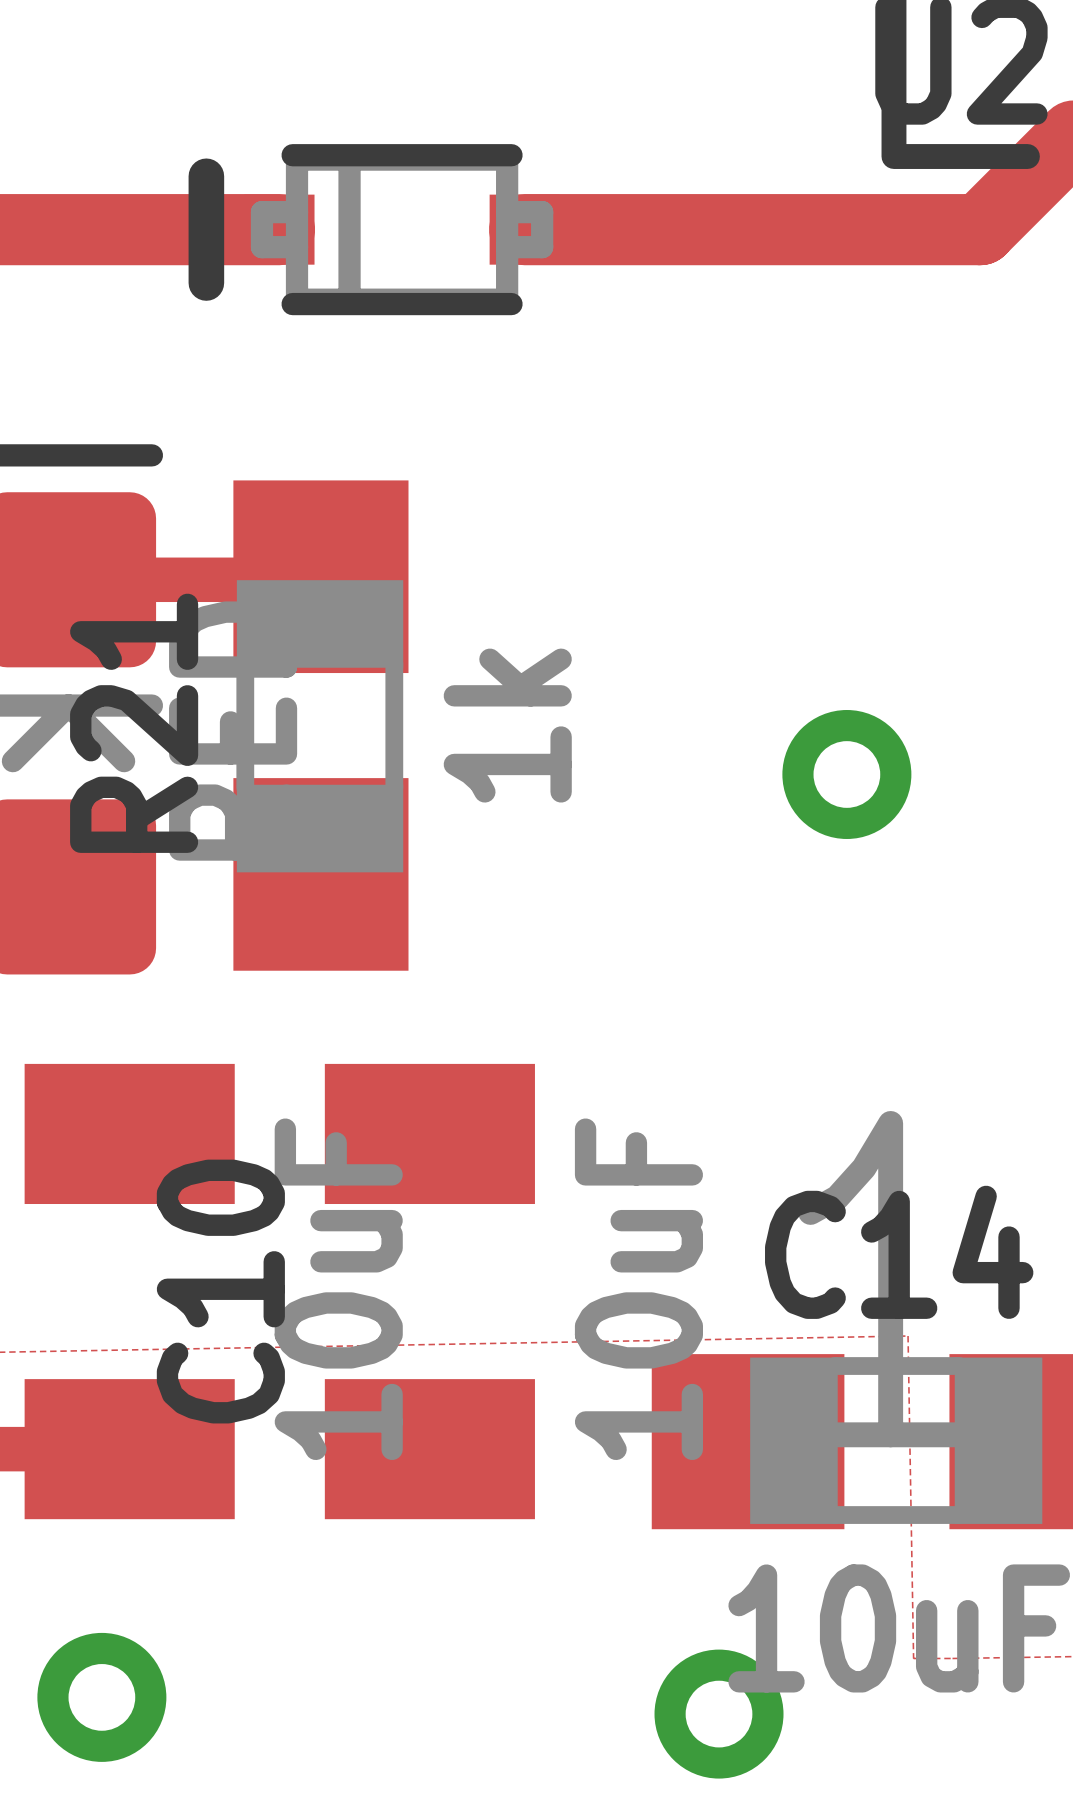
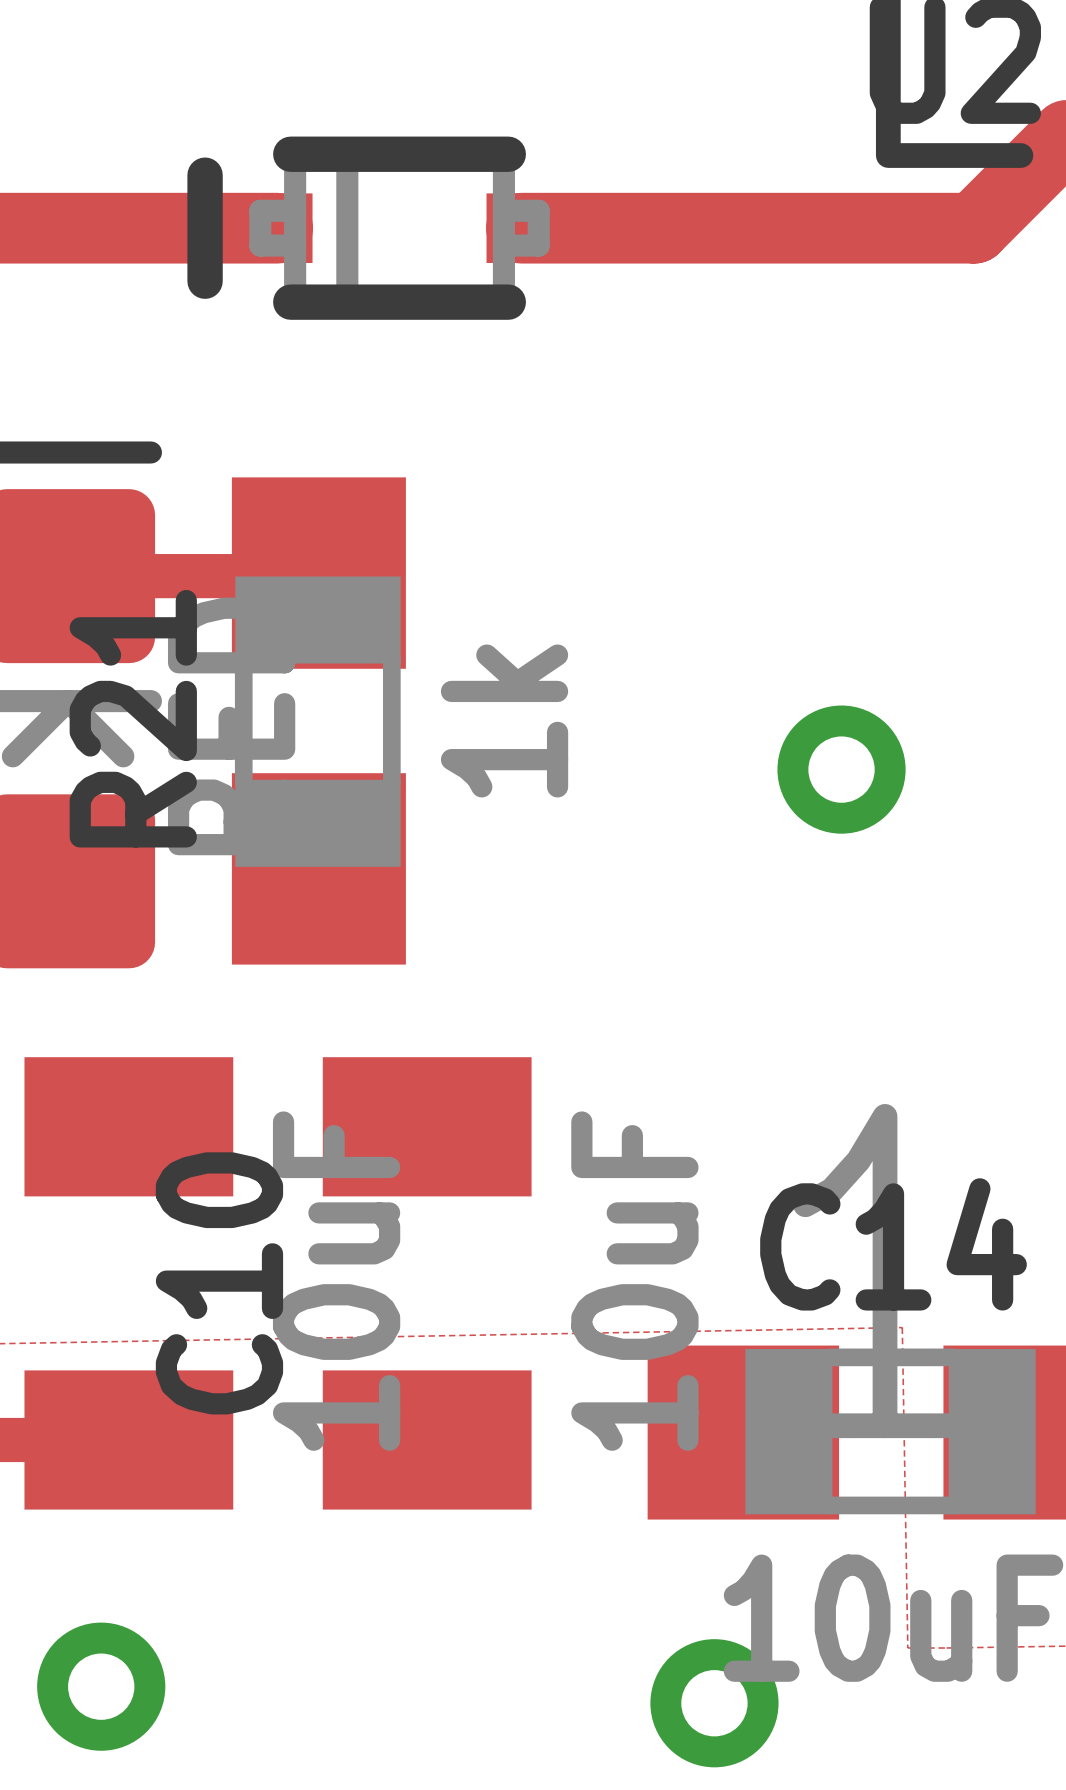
part footprint: [188, 144, 560, 316] -> [187, 136, 557, 320]

